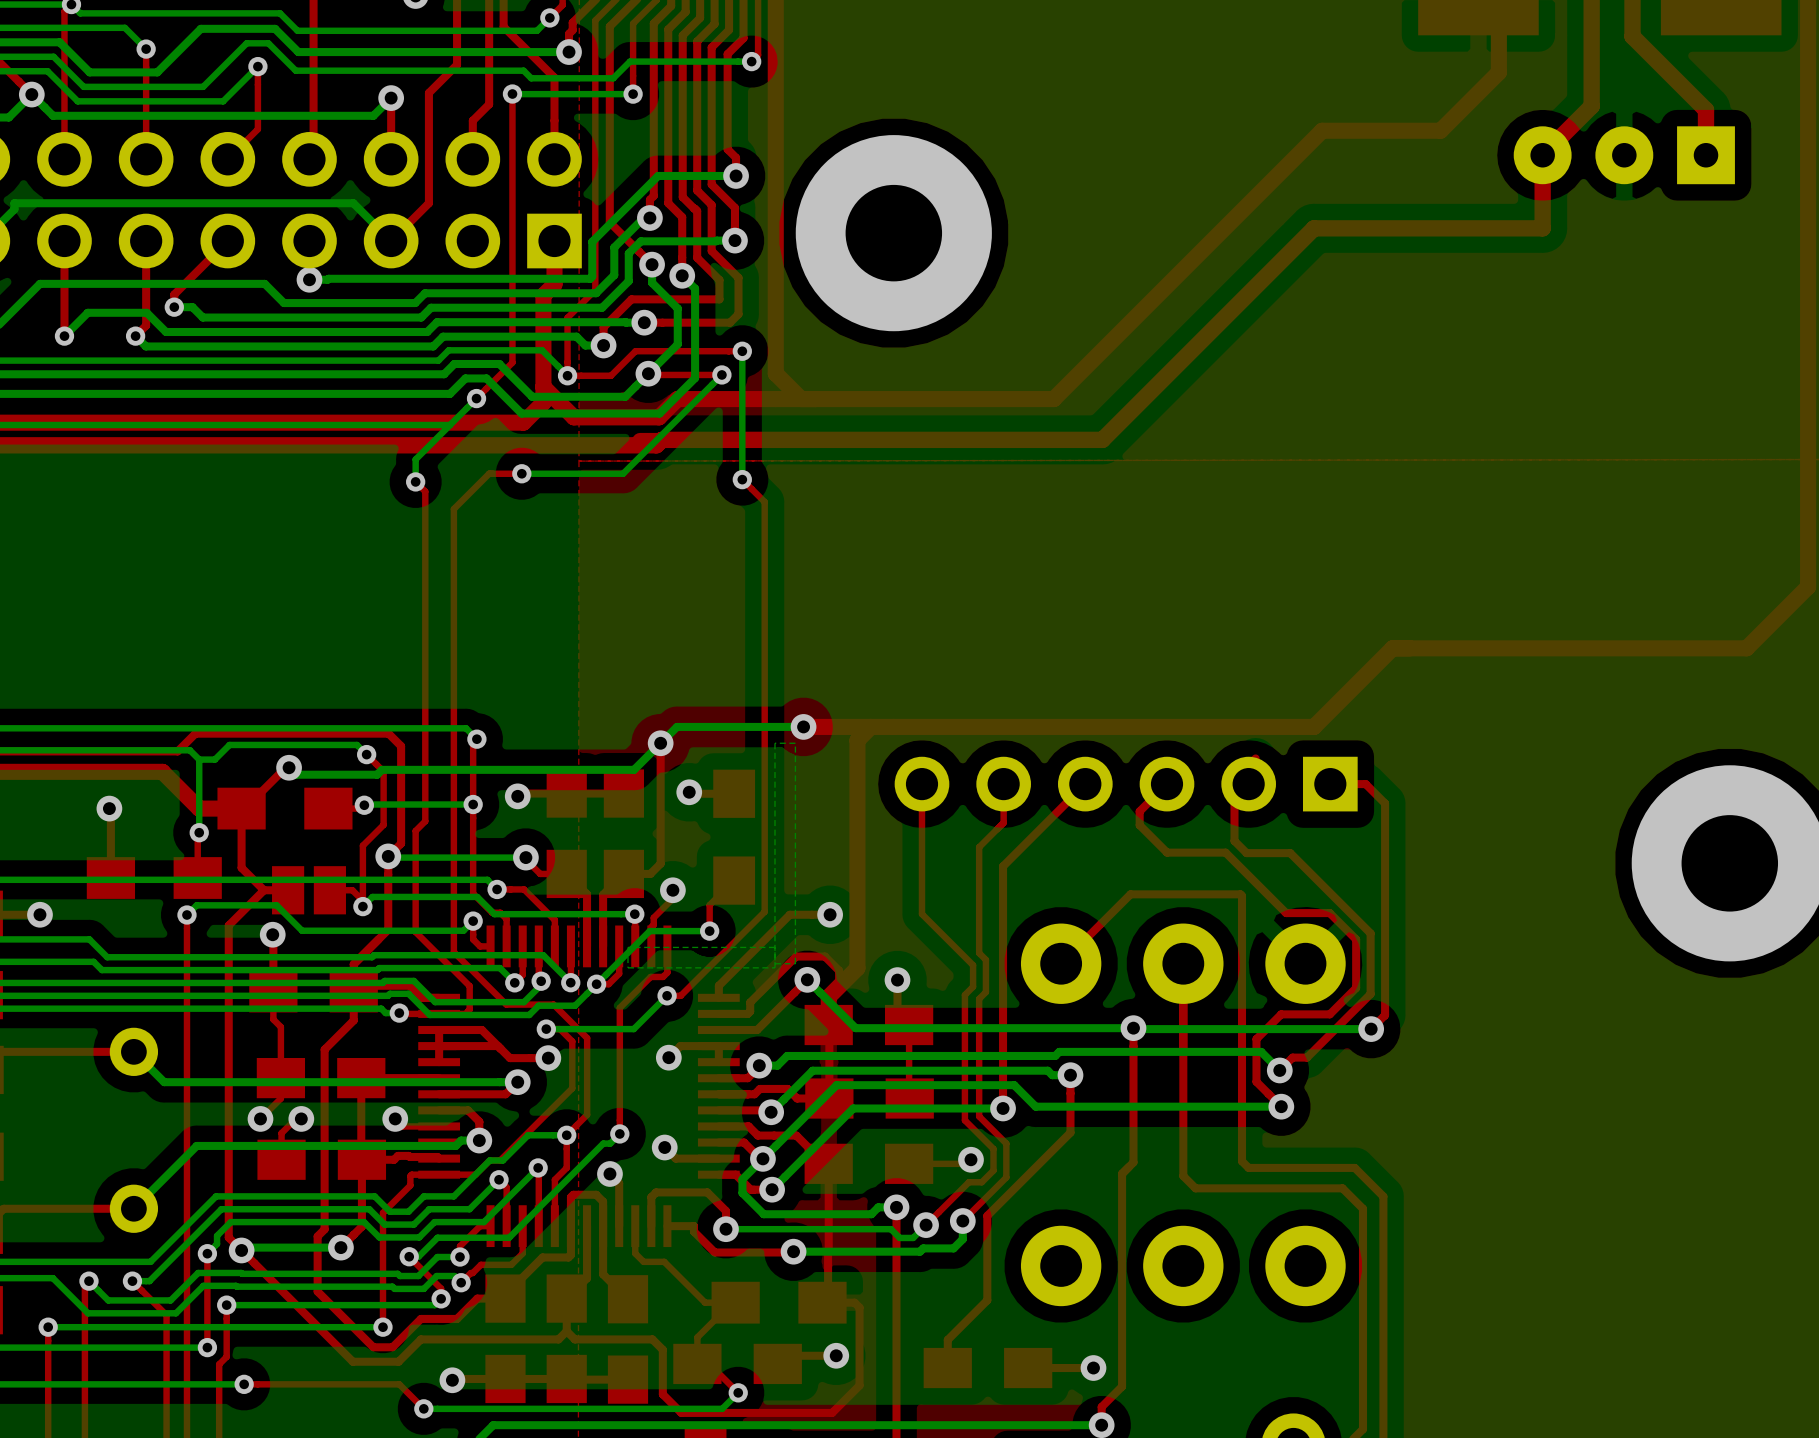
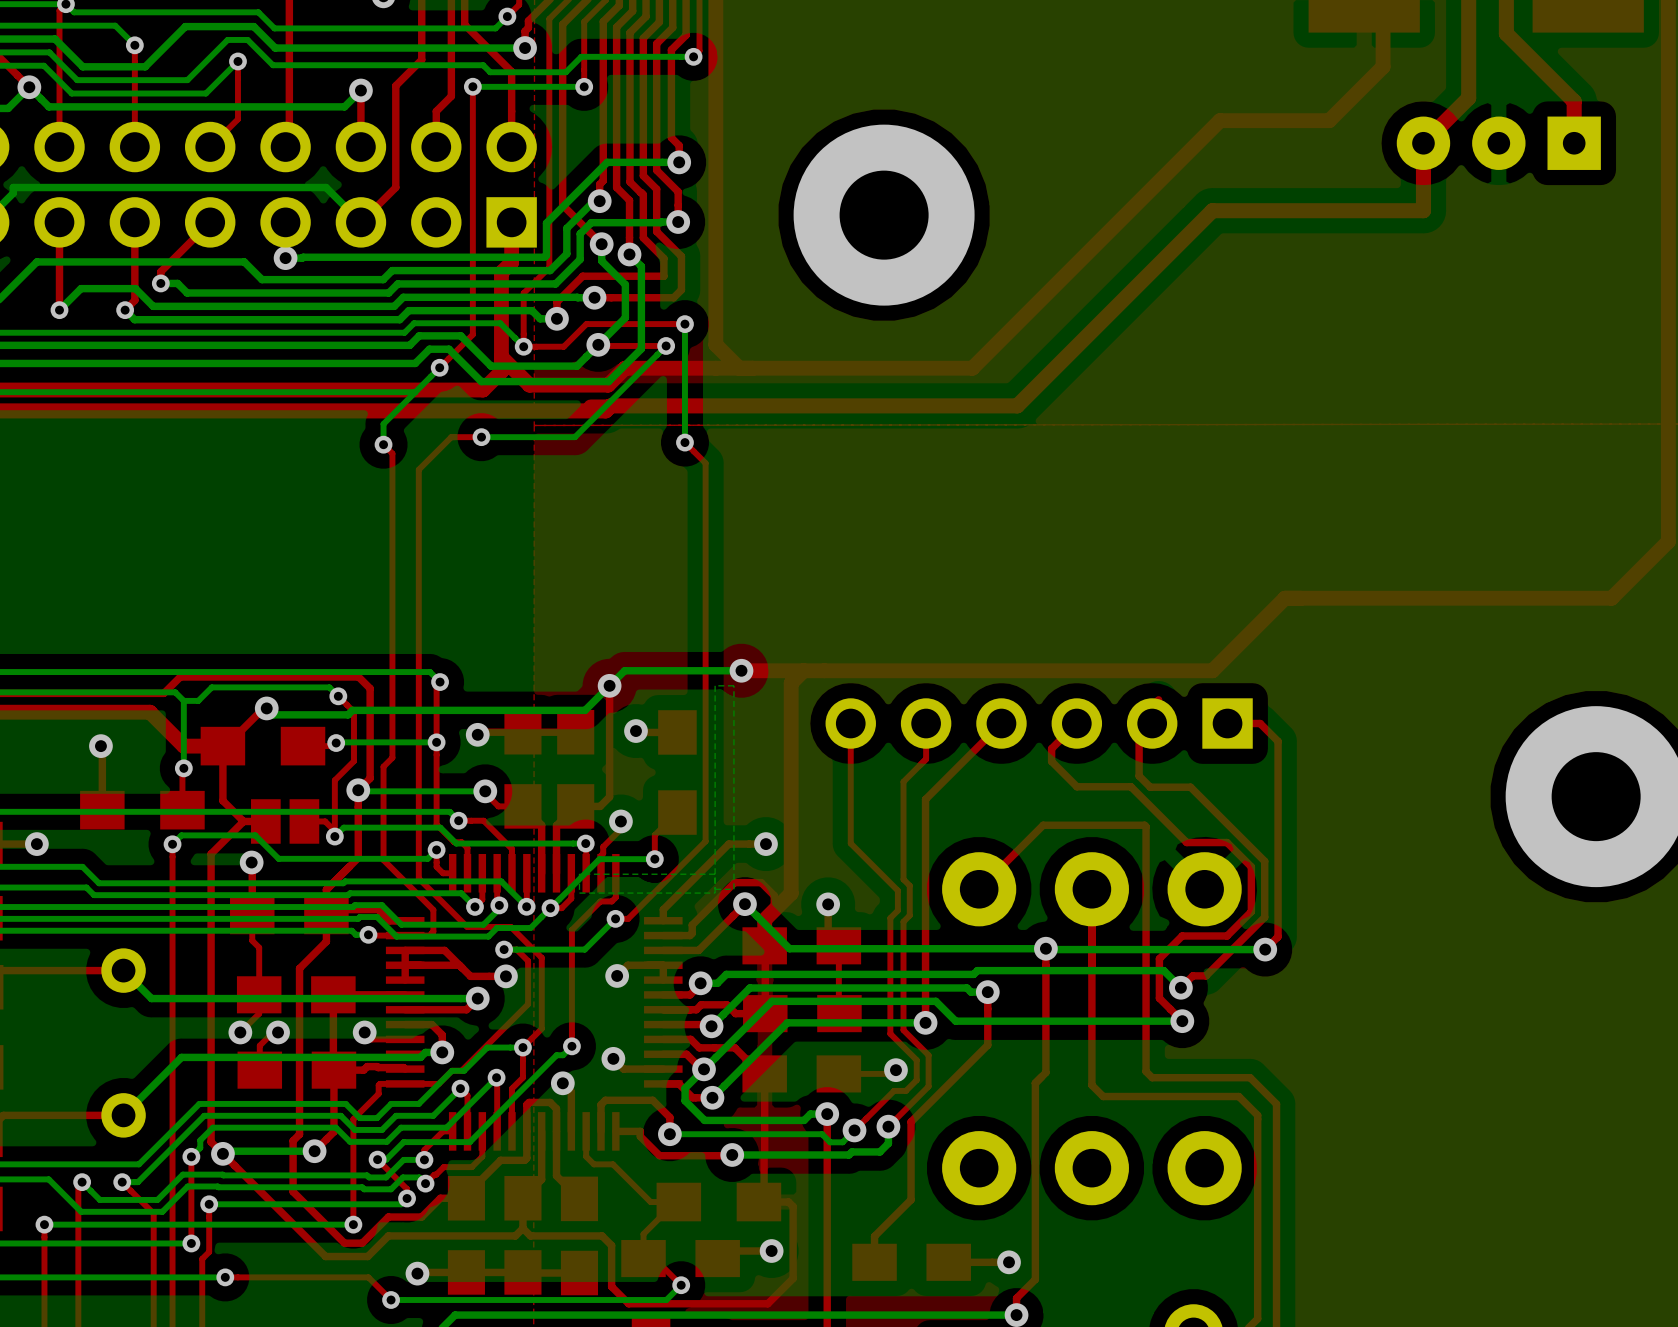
via position: (893, 233) -> (884, 215)

